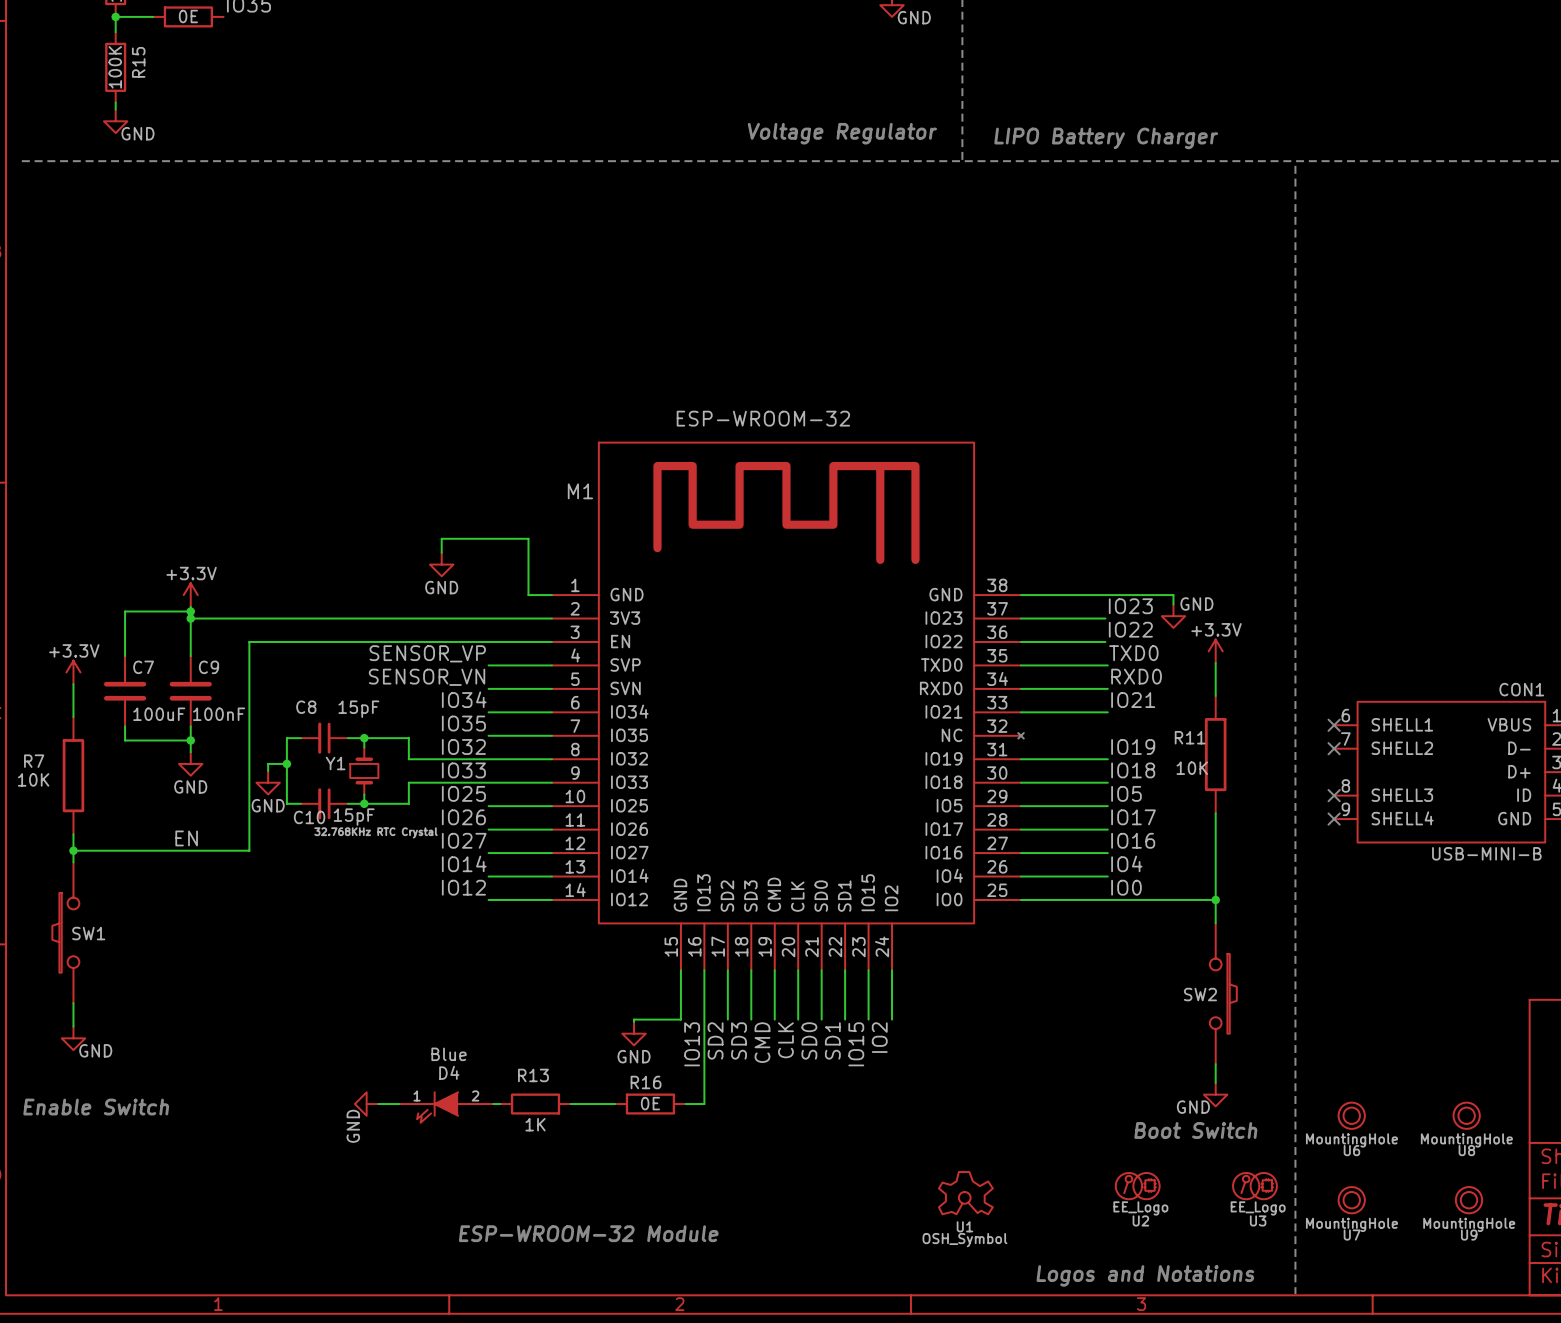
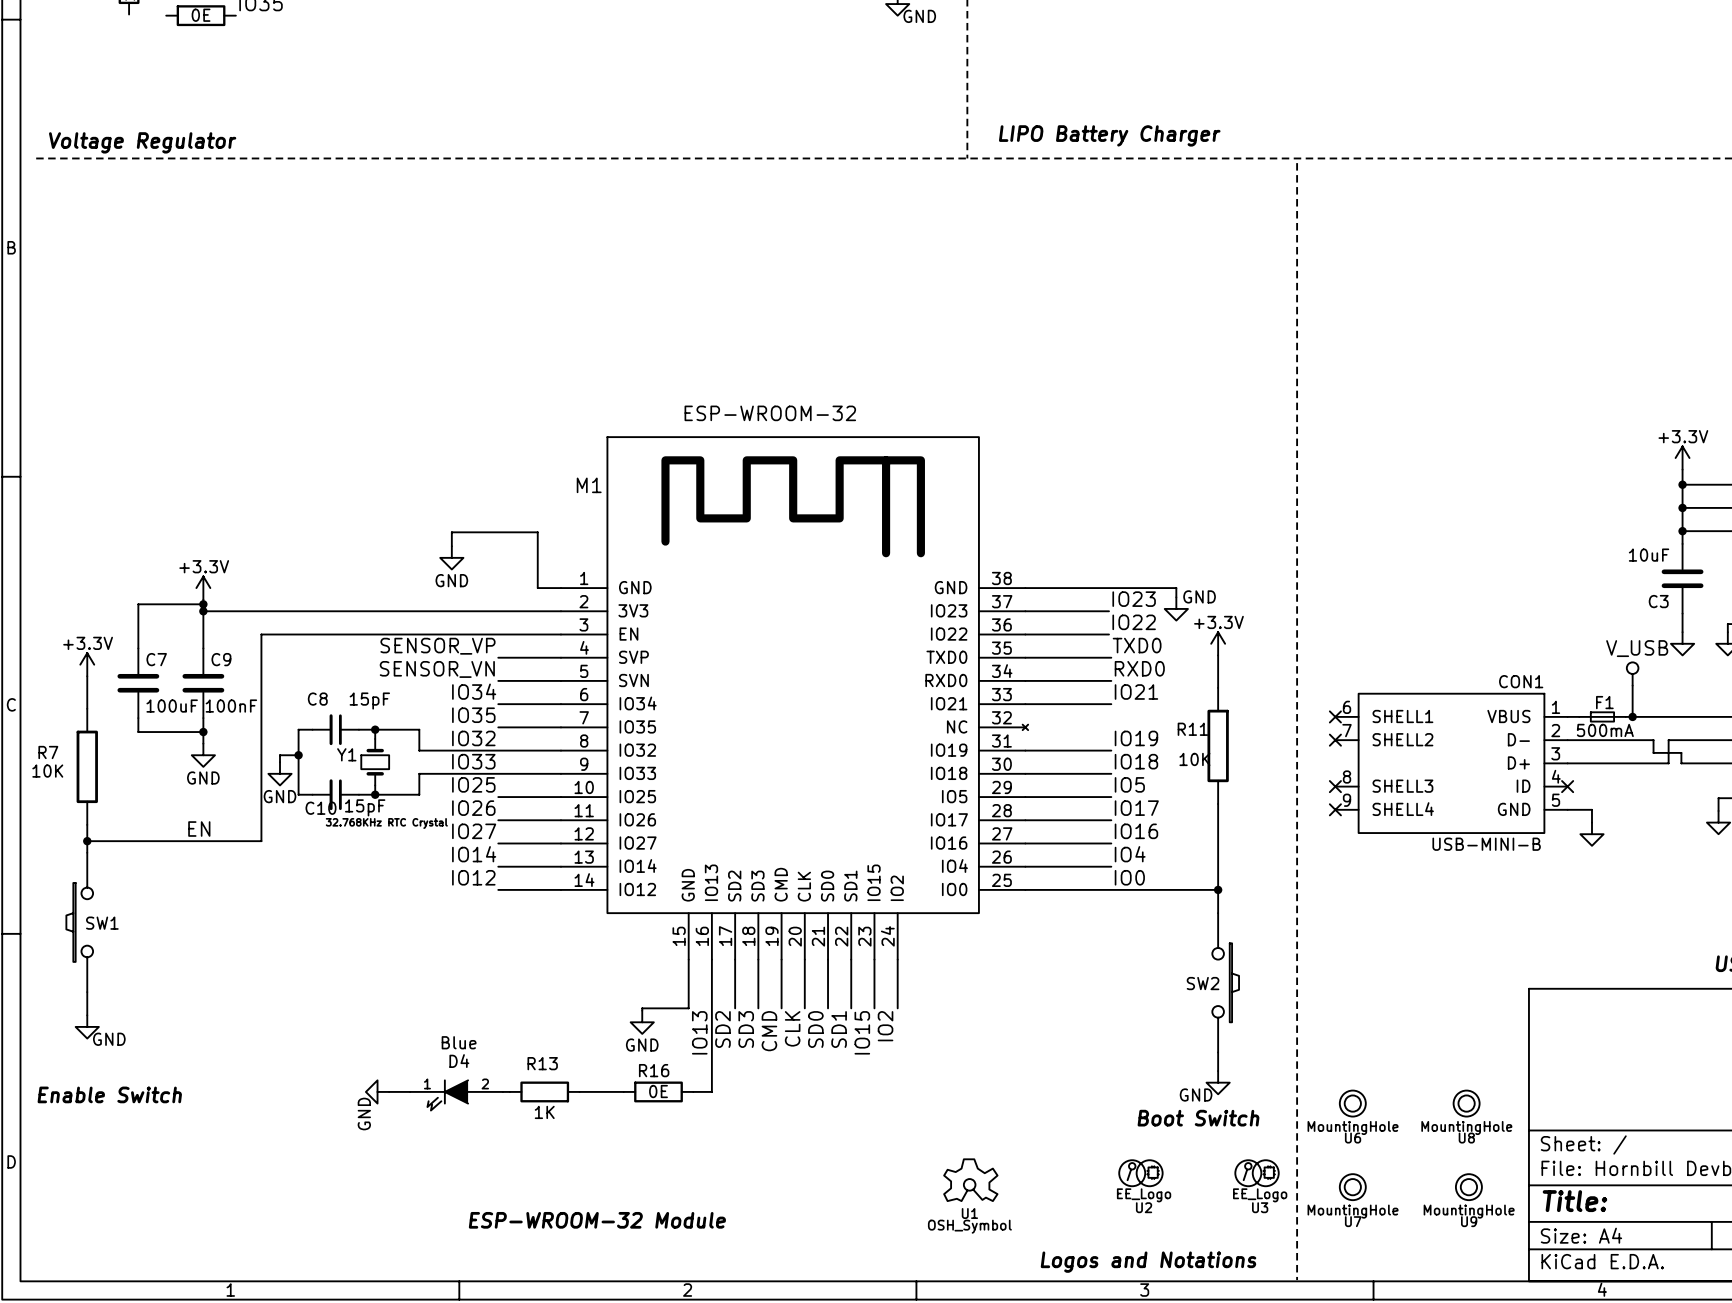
wire: (115, 15) (115, 32) -> none
wire: (115, 16) (153, 16) -> none
junction: (115, 16) -> none
R15: 100K (115, 67) -> none
wire: (115, 102) (115, 109) -> none
power symbol: GND (115, 121) -> none
text: Voltage Regulator (842, 133) -> none
text: none -> Voltage Regulator (142, 142)

